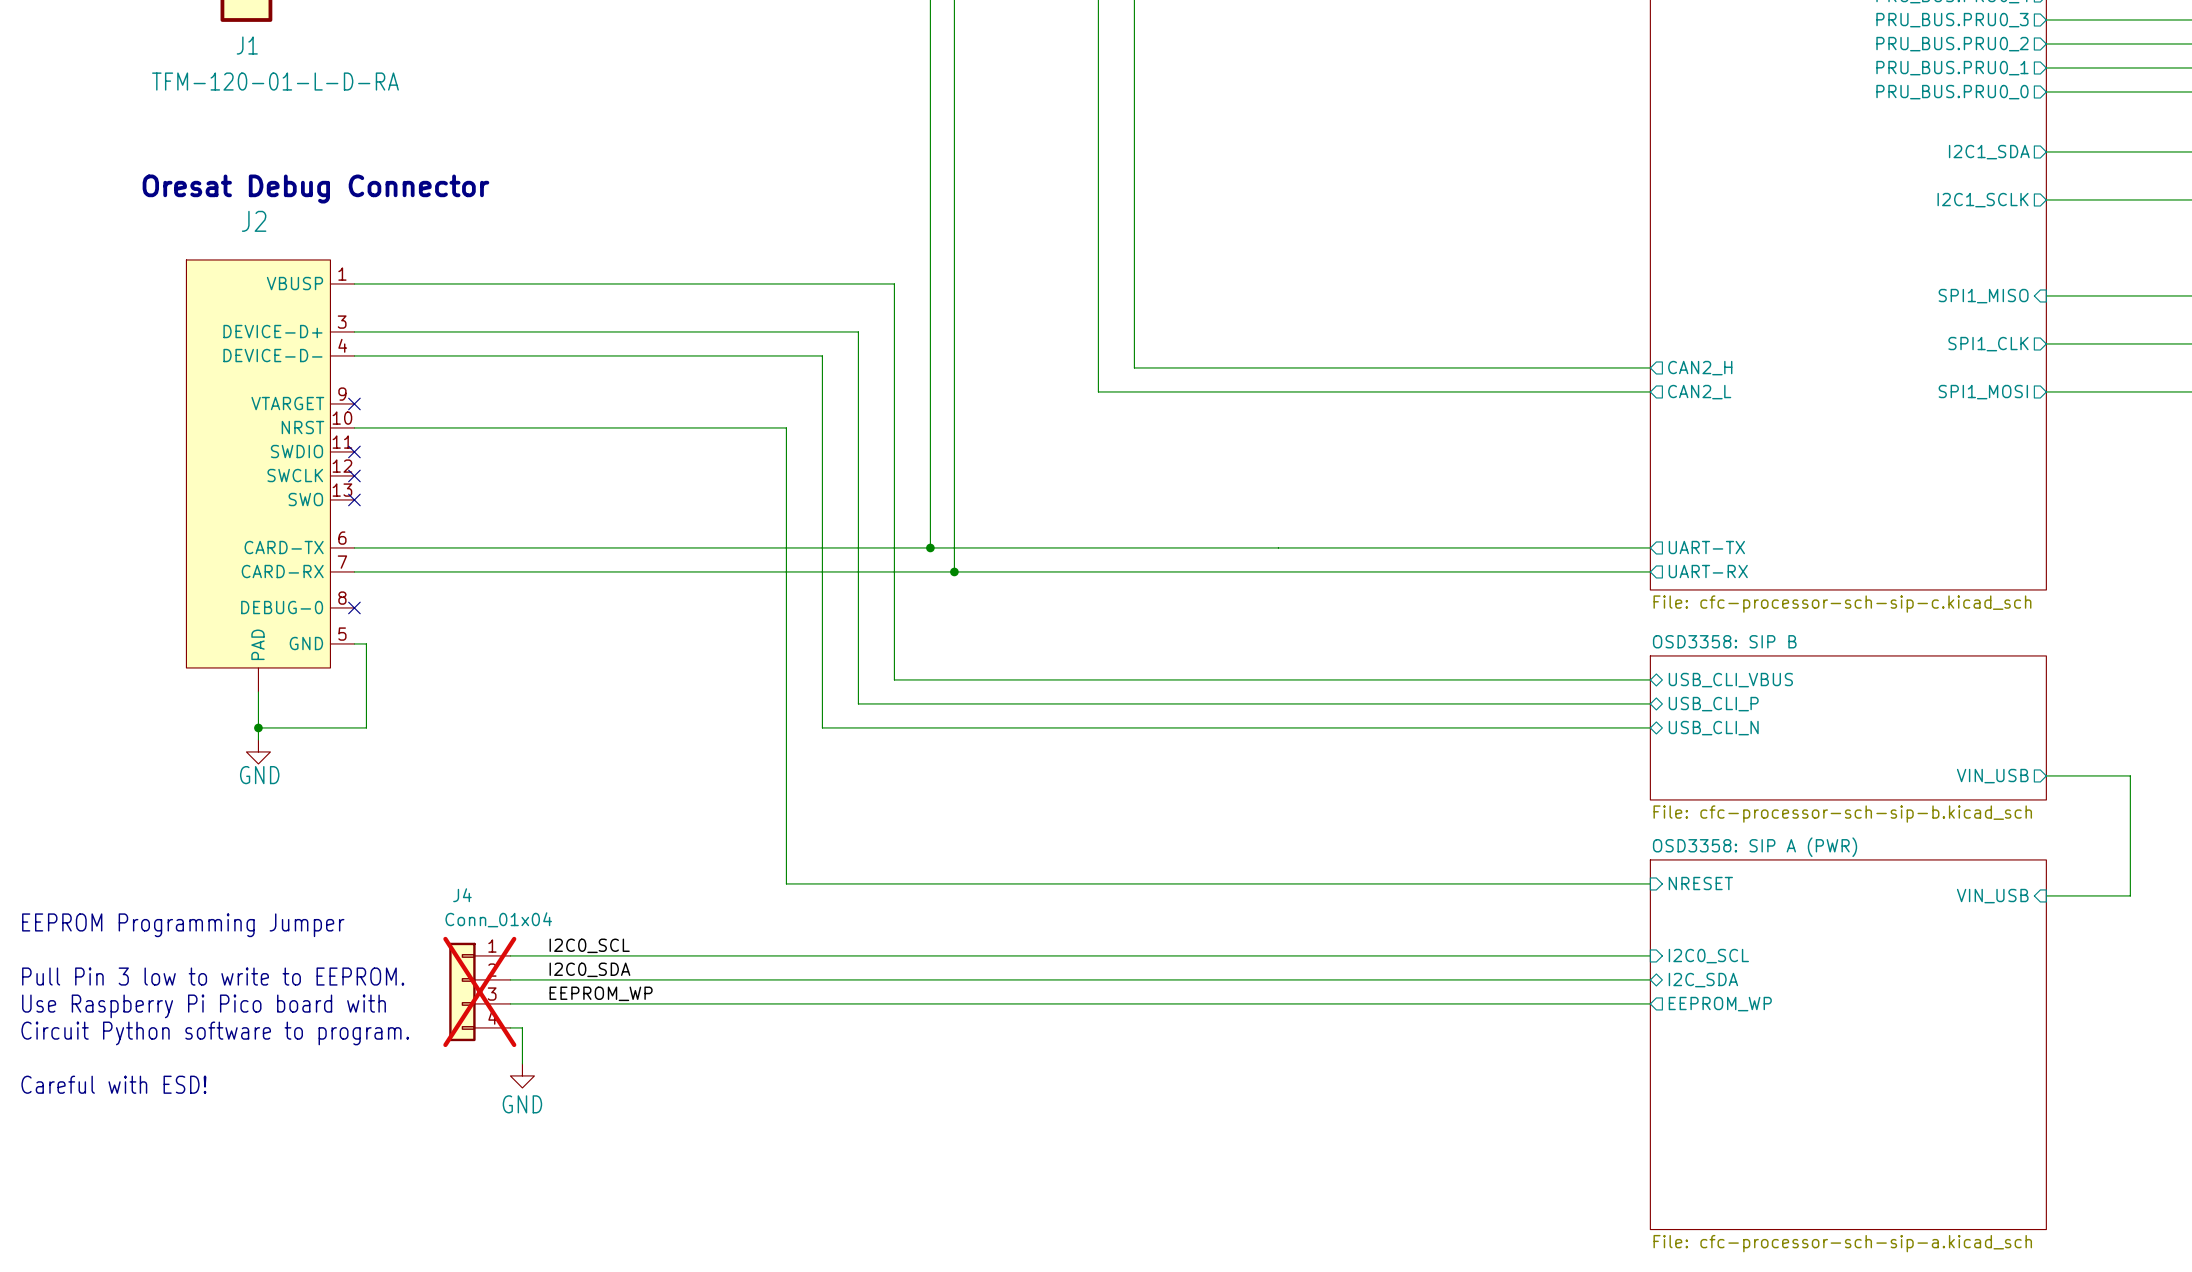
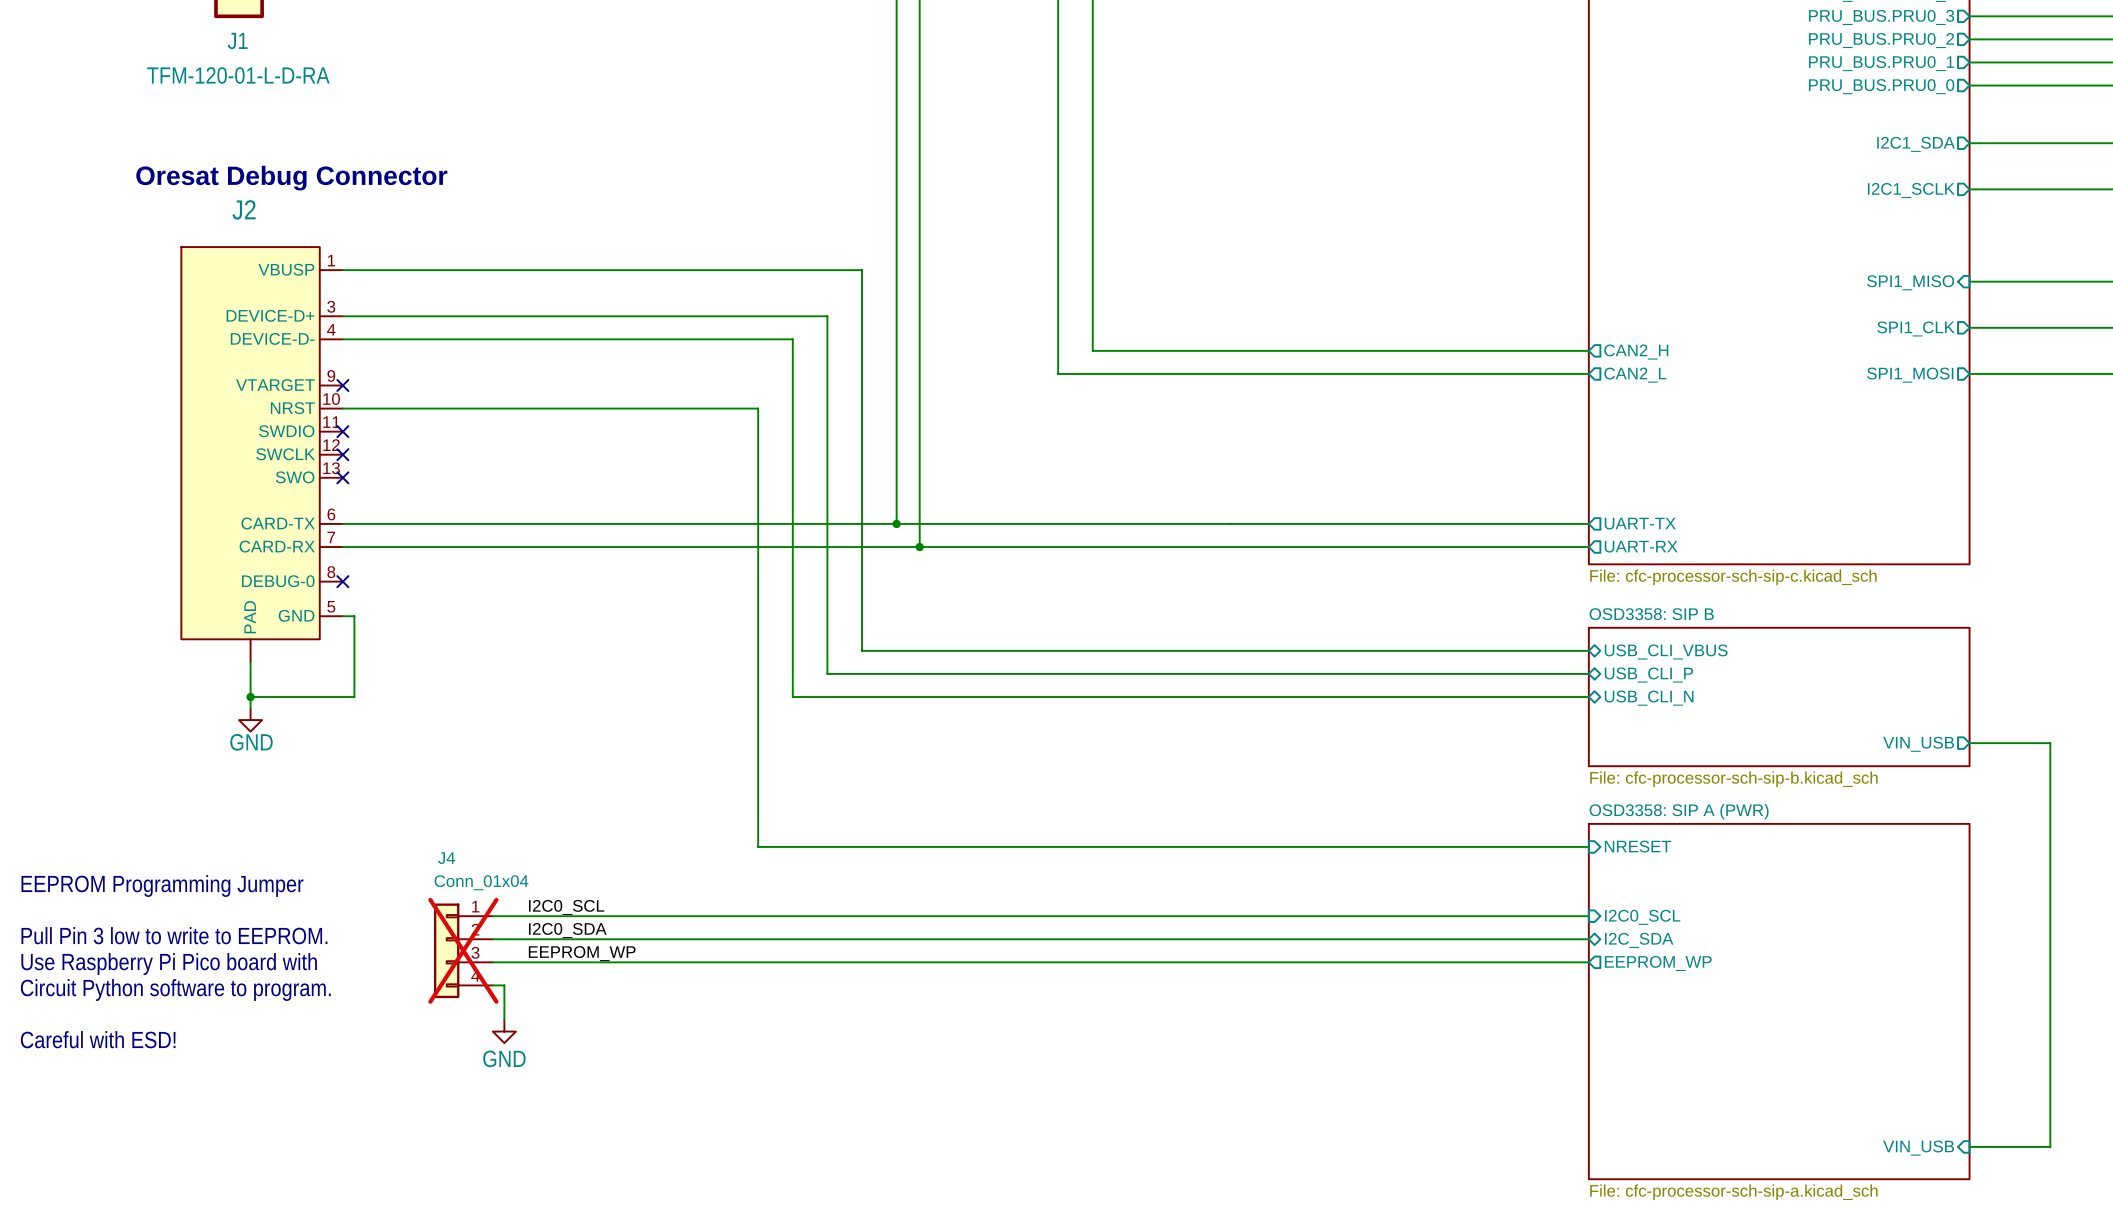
wire: (2046, 895) (2130, 895) -> (1969, 1146) (2050, 1146) (2050, 858)
sheet pin: VIN_USB (1992, 896) -> none
sheet pin: none -> VIN_USB (1918, 1148)

